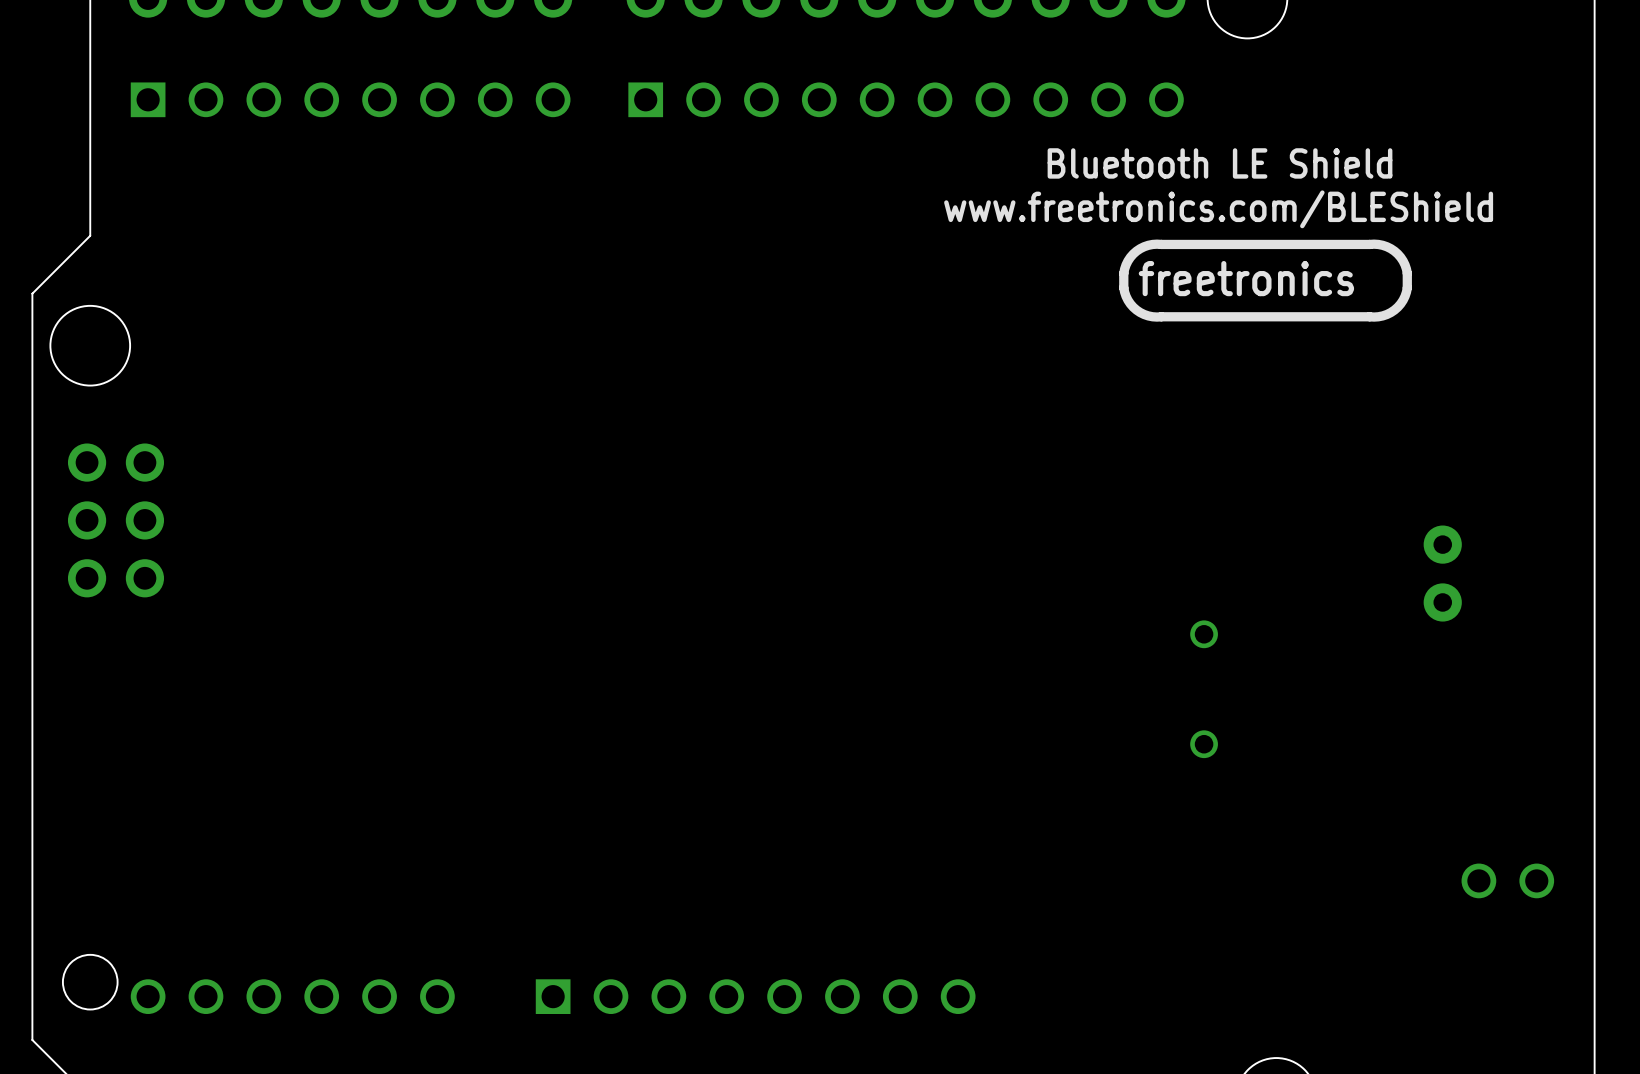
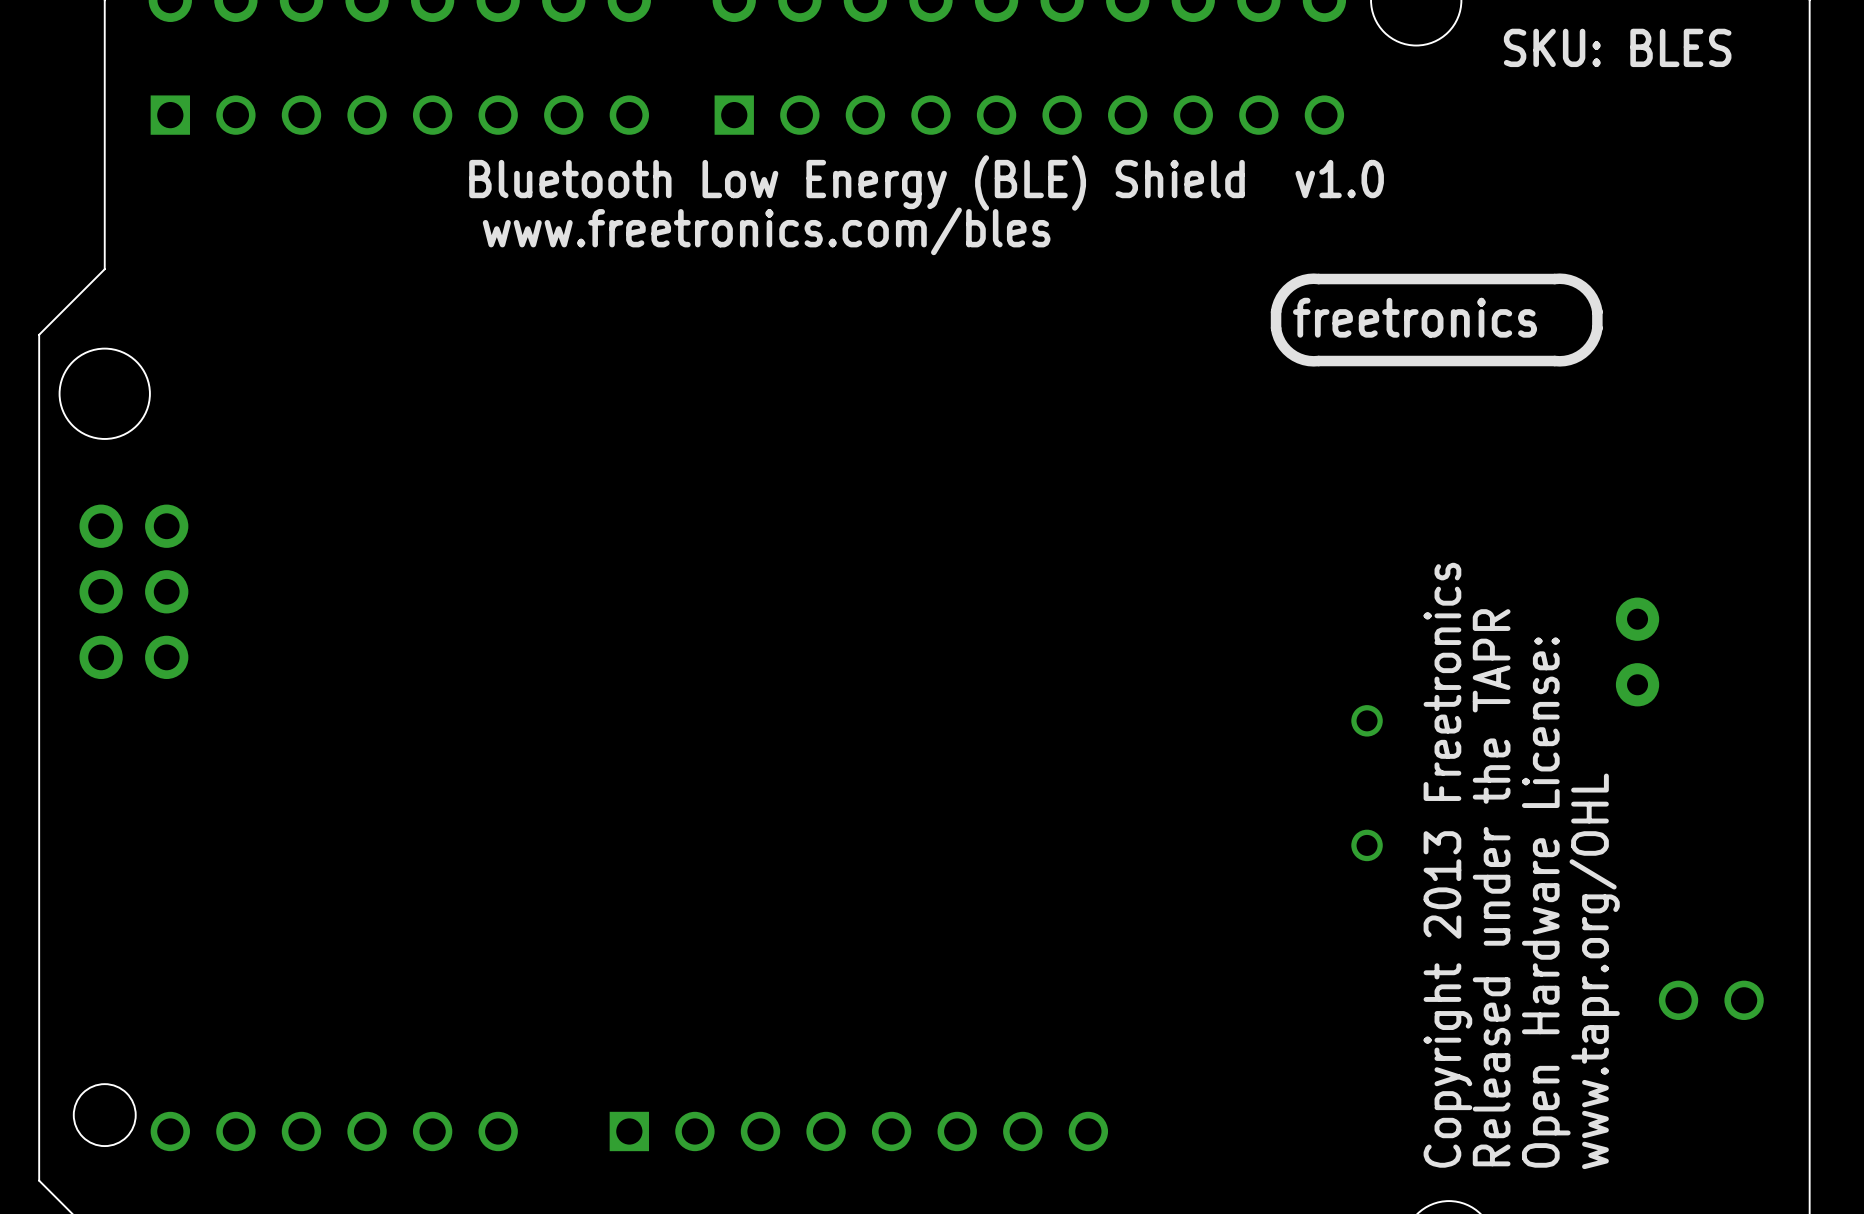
text: none -> SKU: BLES (1617, 47)
text: none -> Bluetooth Low Energy (BLE) Shield v1.0 (926, 182)
text: Bluetooth LE Shield (1220, 163) -> none
text: www.freetronics.com/BLEShield (1218, 209) -> www.freetronics.com/bles (766, 231)
text: none -> Copyright 2013 Freetronics (1447, 865)
text: none -> Released under the TAPR (1491, 887)
text: none -> Open Hardware License: (1546, 902)
text: none -> www.tapr.org/OHL (1594, 971)

